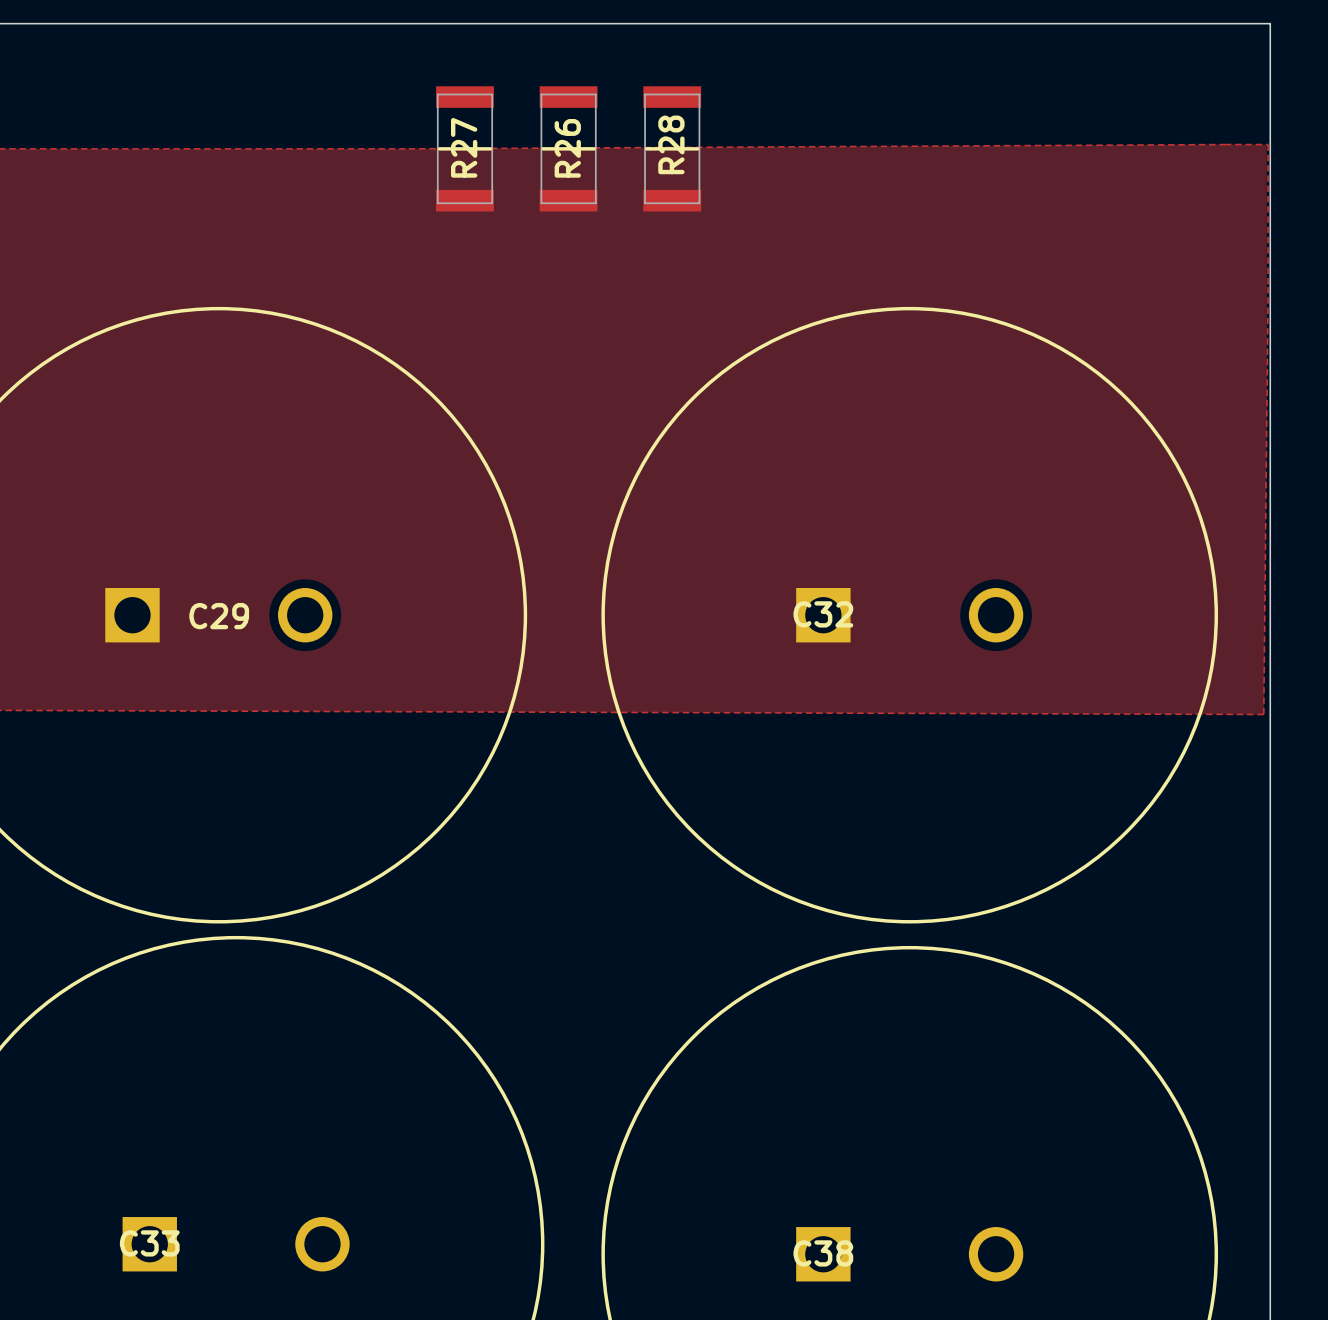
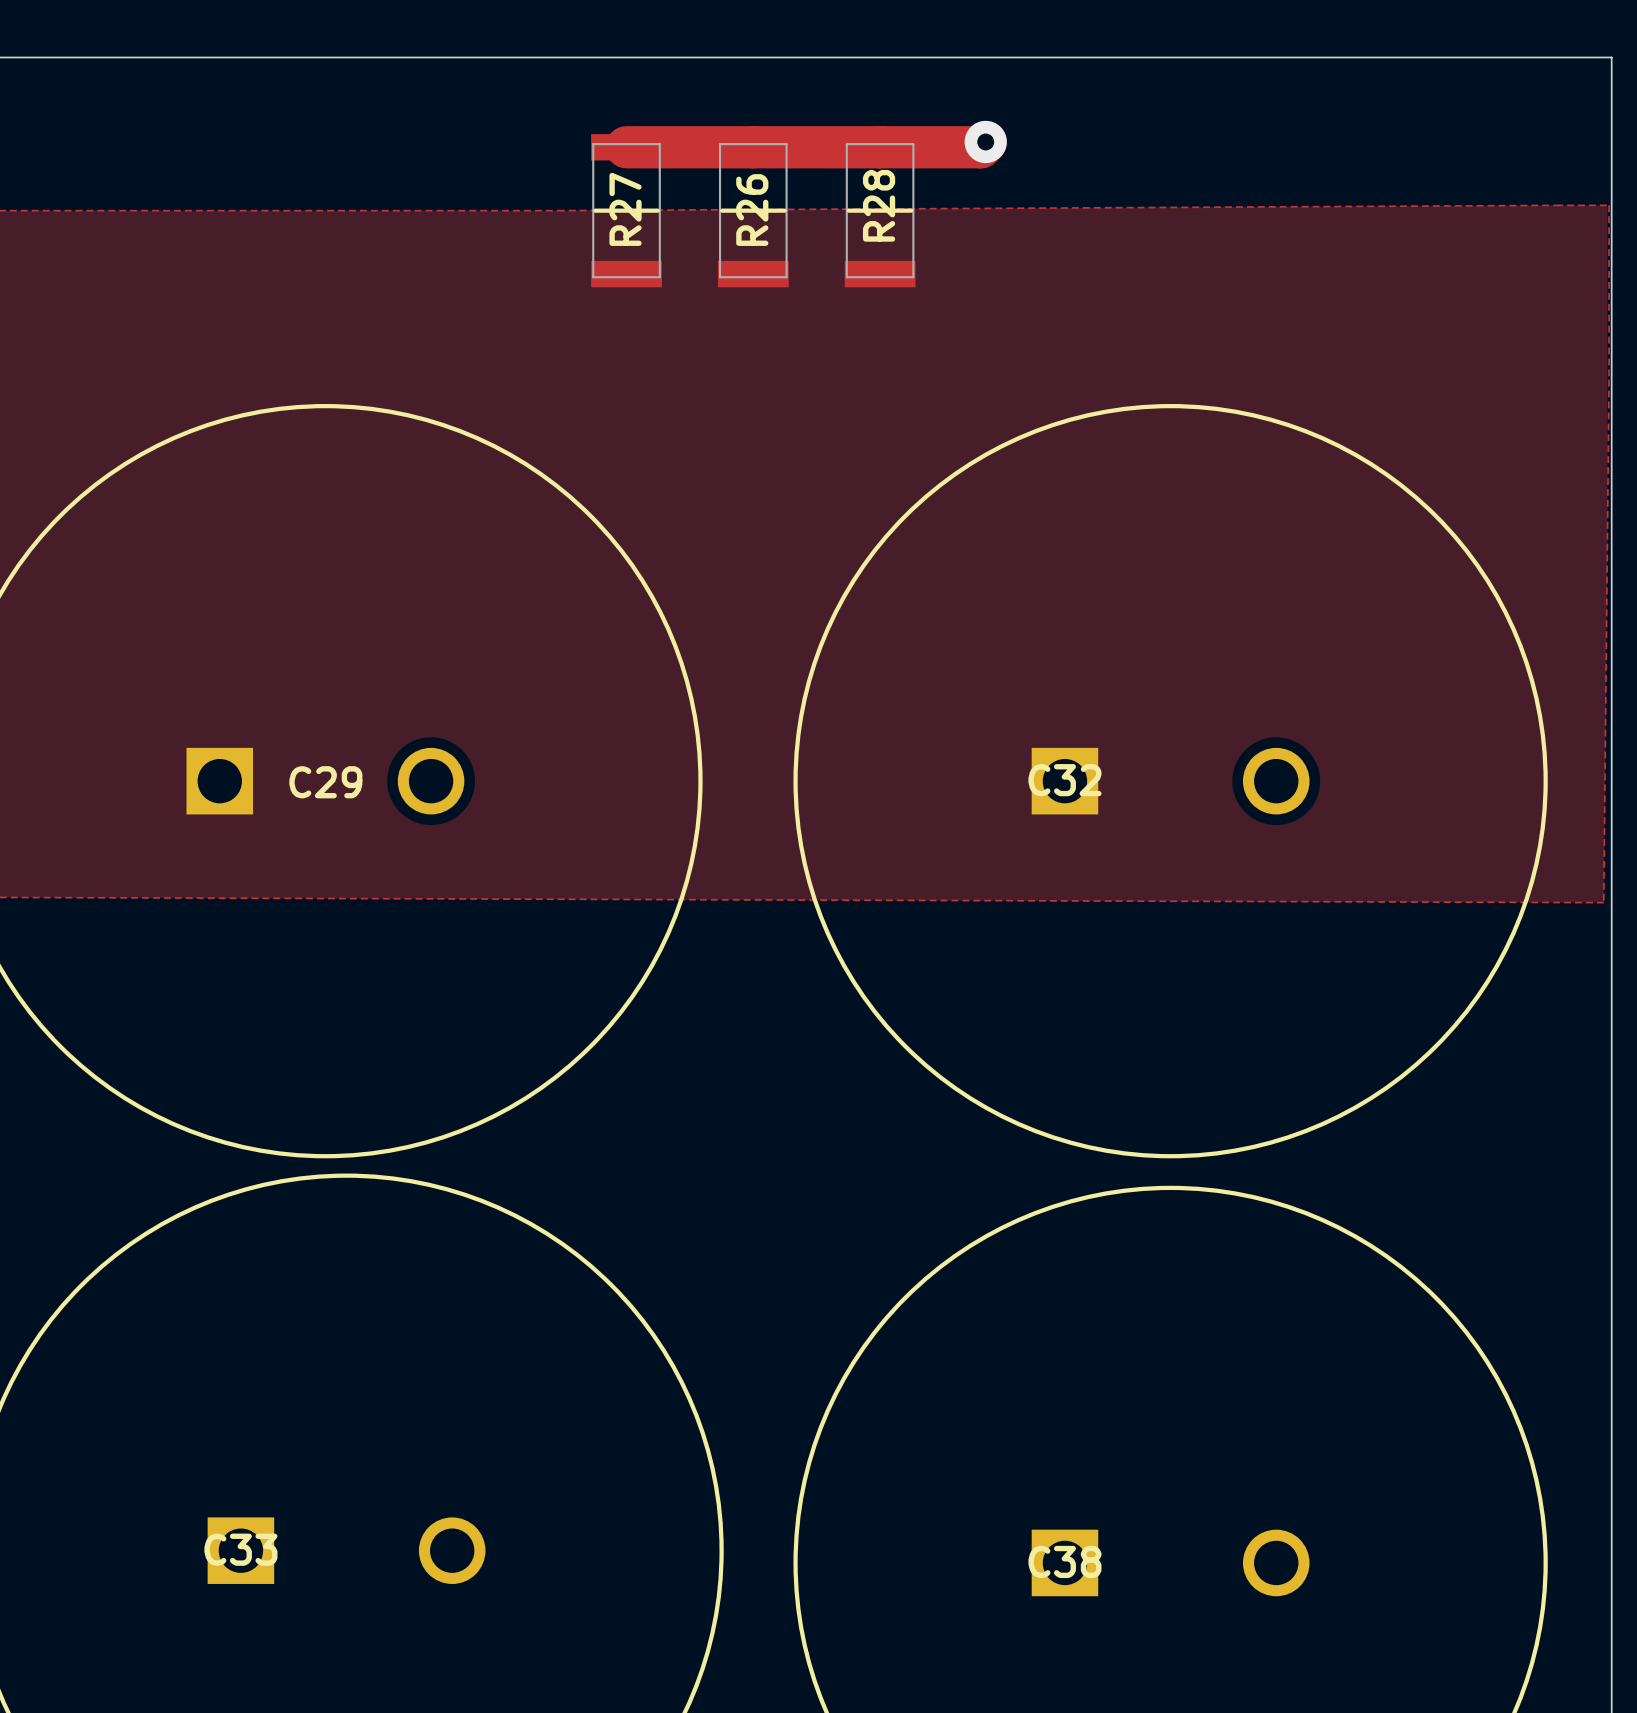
track: none -> (985, 141) (980, 147) (626, 147)
via: none -> (985, 141)

